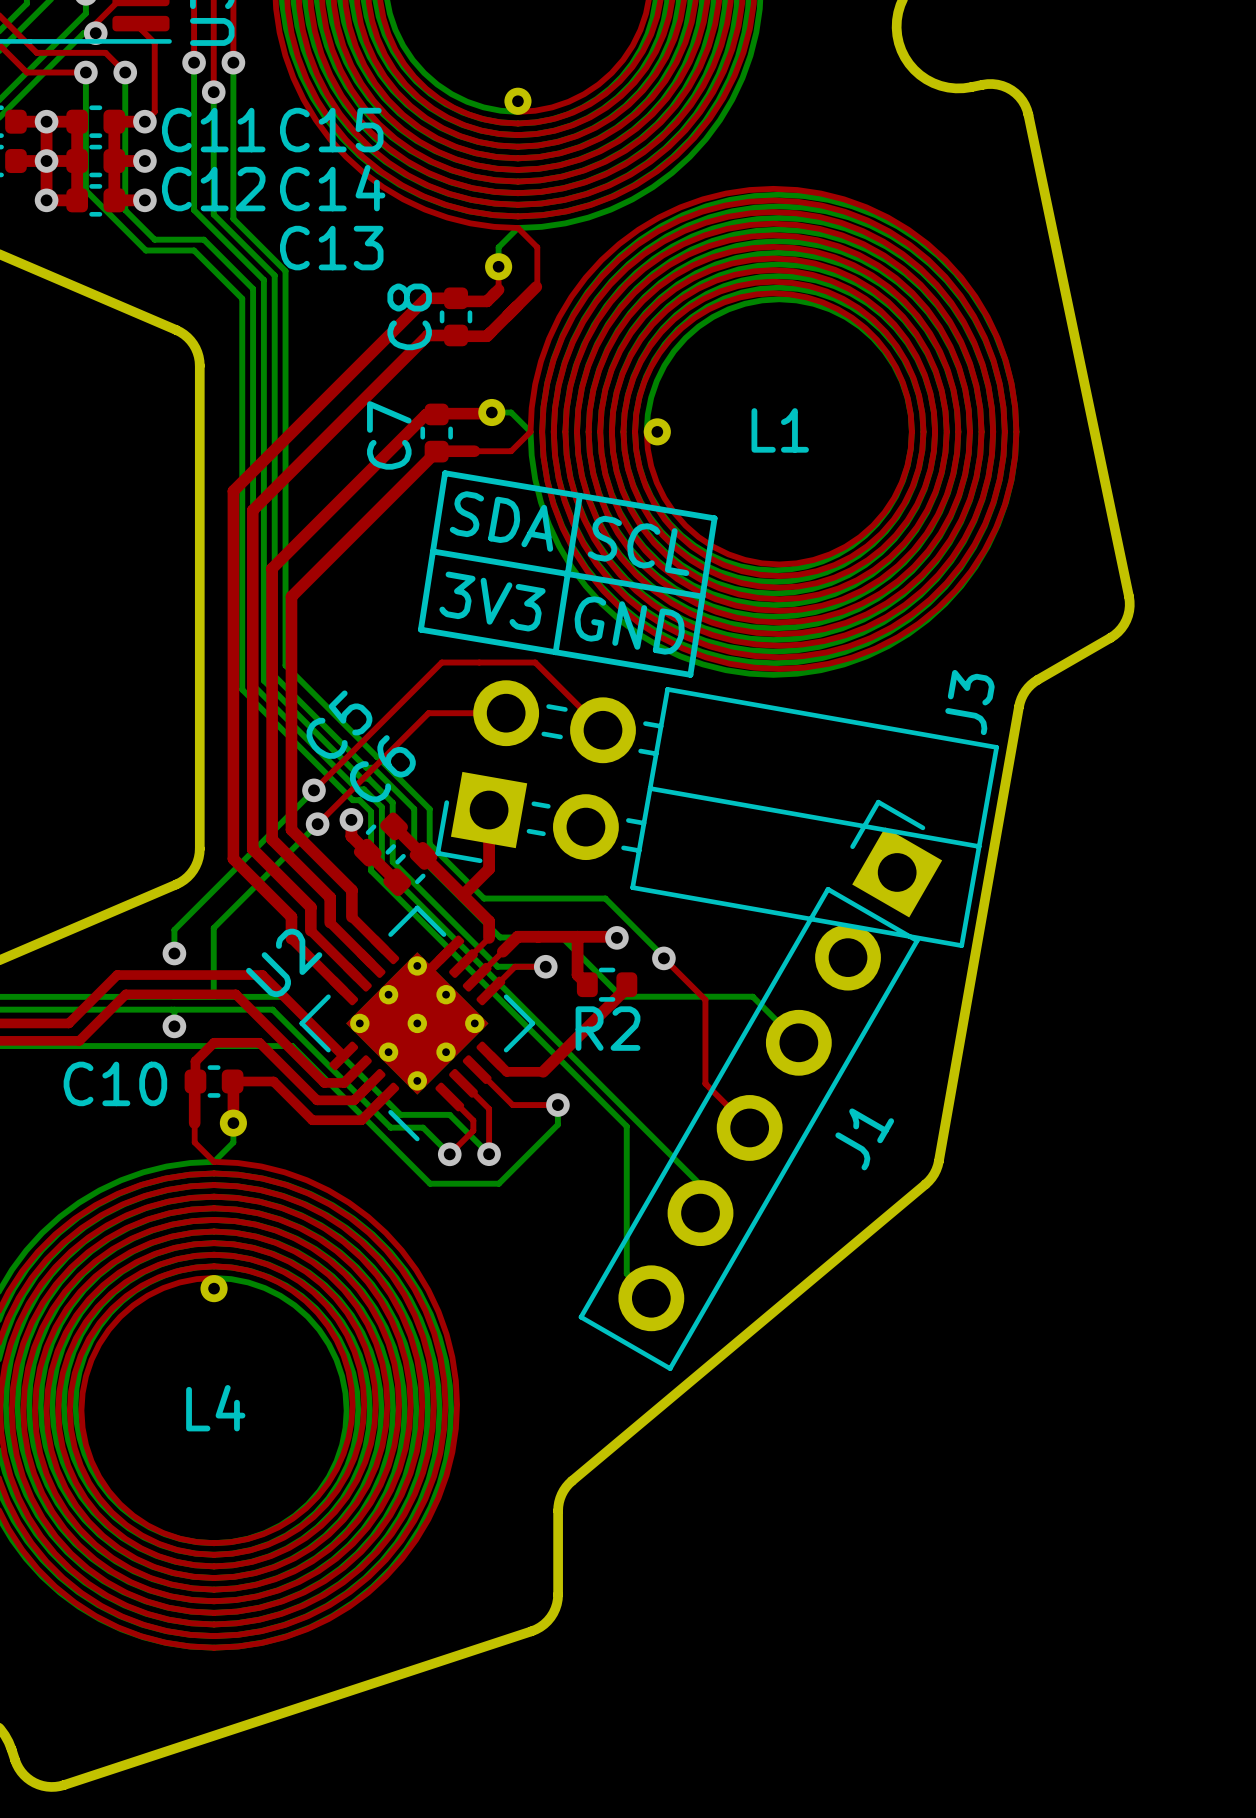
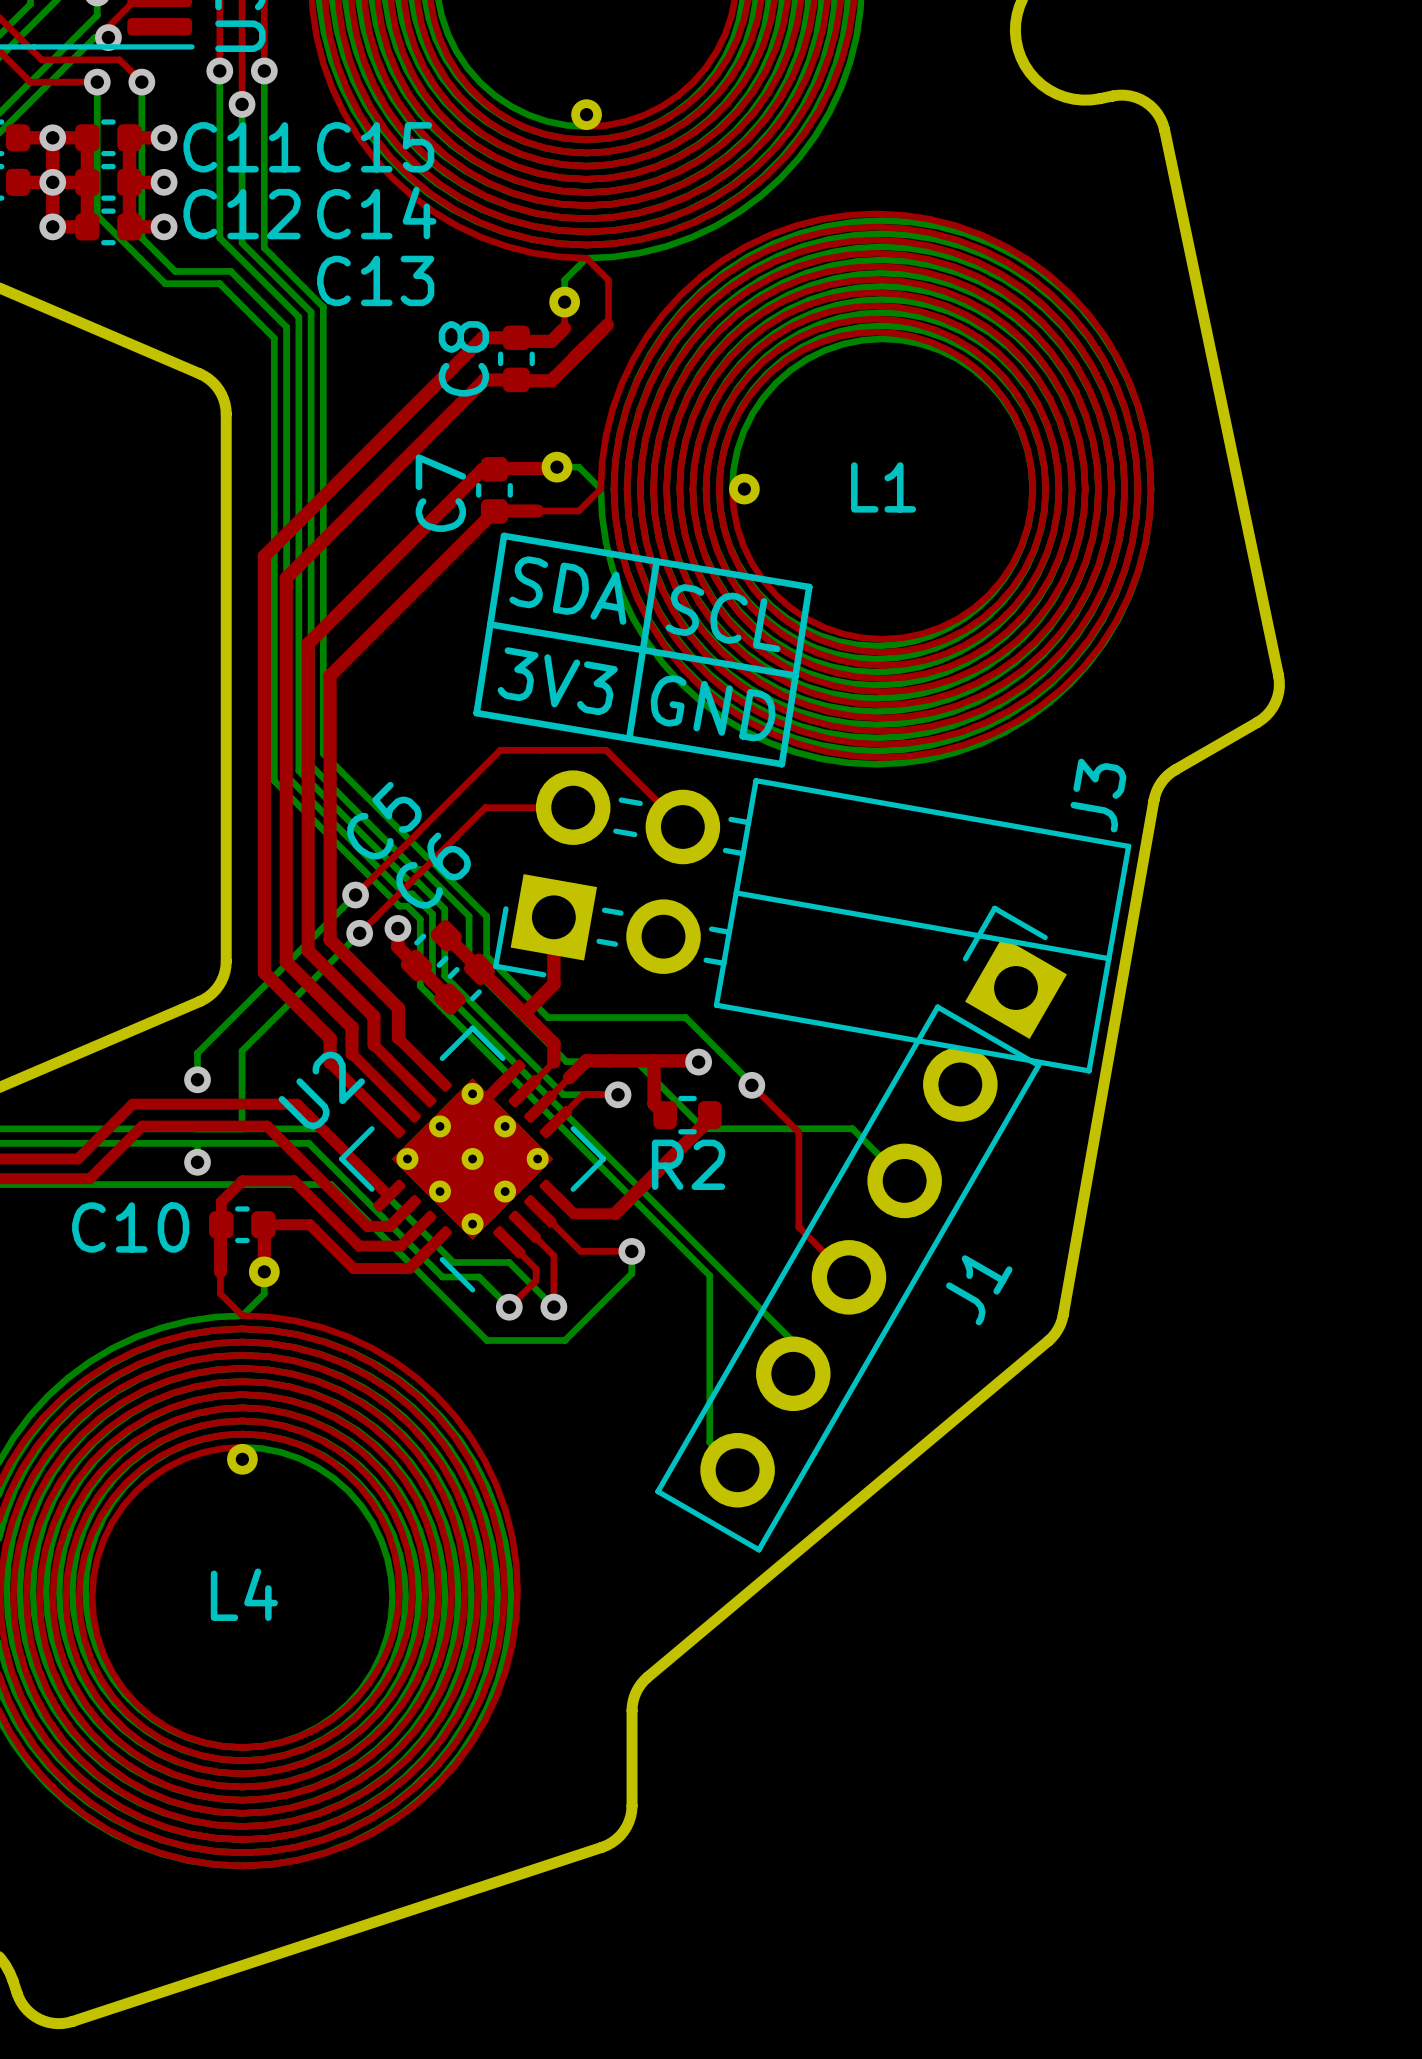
top track: (140, 23) (140, 29) (154, 43) (154, 111) (144, 121) -> none

